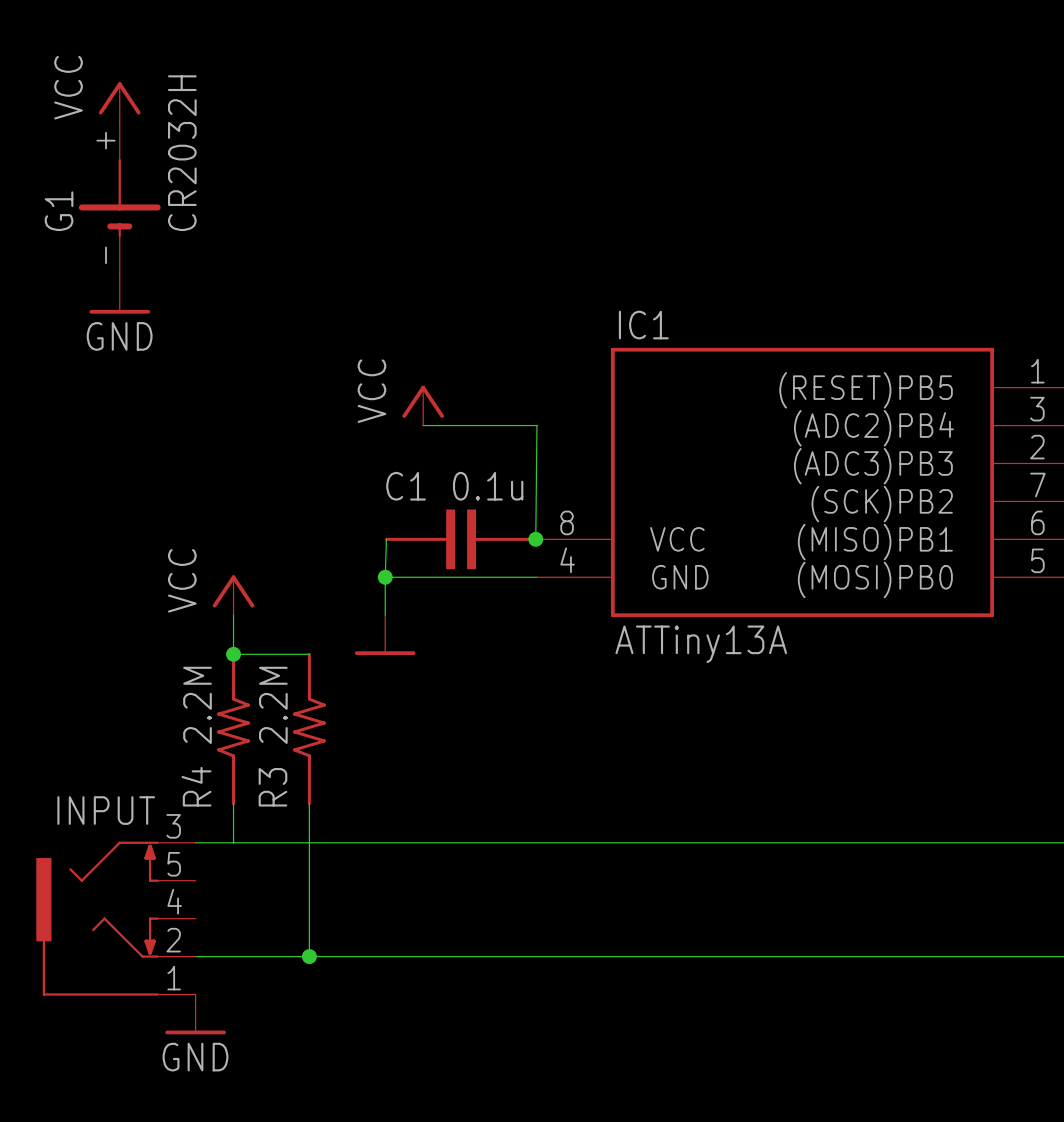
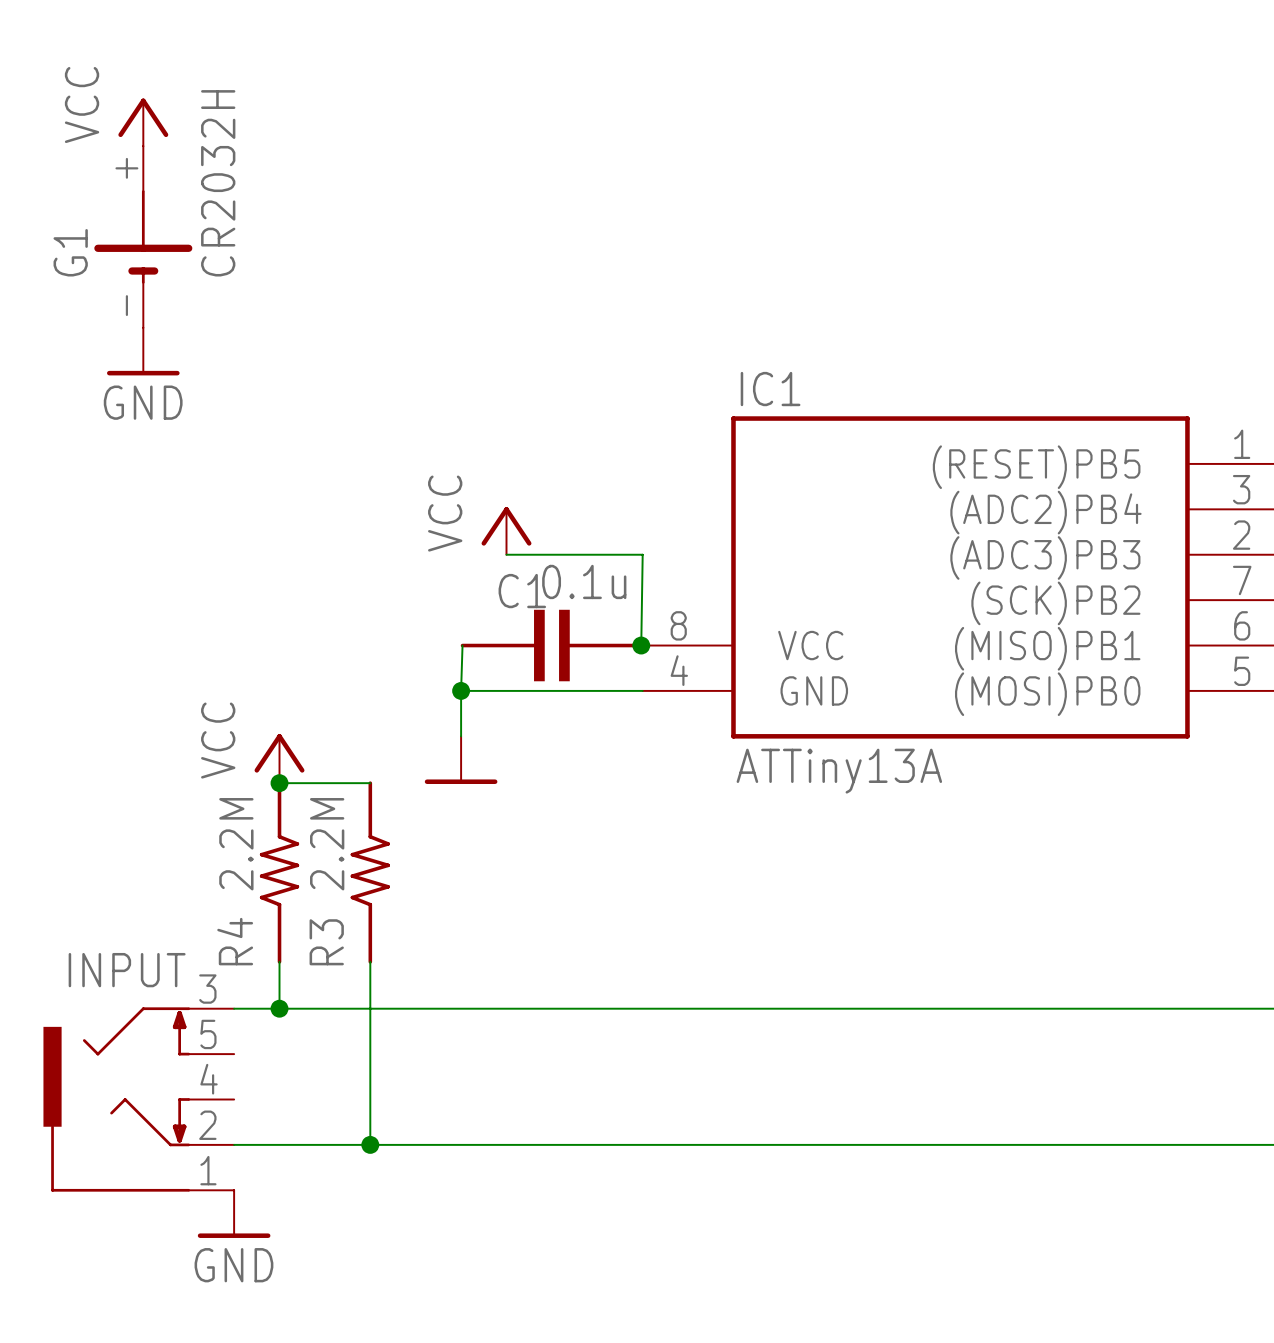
power symbol position: VCC (423, 405) -> VCC (506, 530)
wire: (423, 425) (536, 425) (535, 539) -> (506, 554) (642, 554) (641, 645)
C1 name position: C1 (406, 486) -> C1 (522, 591)
power symbol position: VCC (233, 595) -> VCC (279, 757)
junction: none -> (279, 1008)

